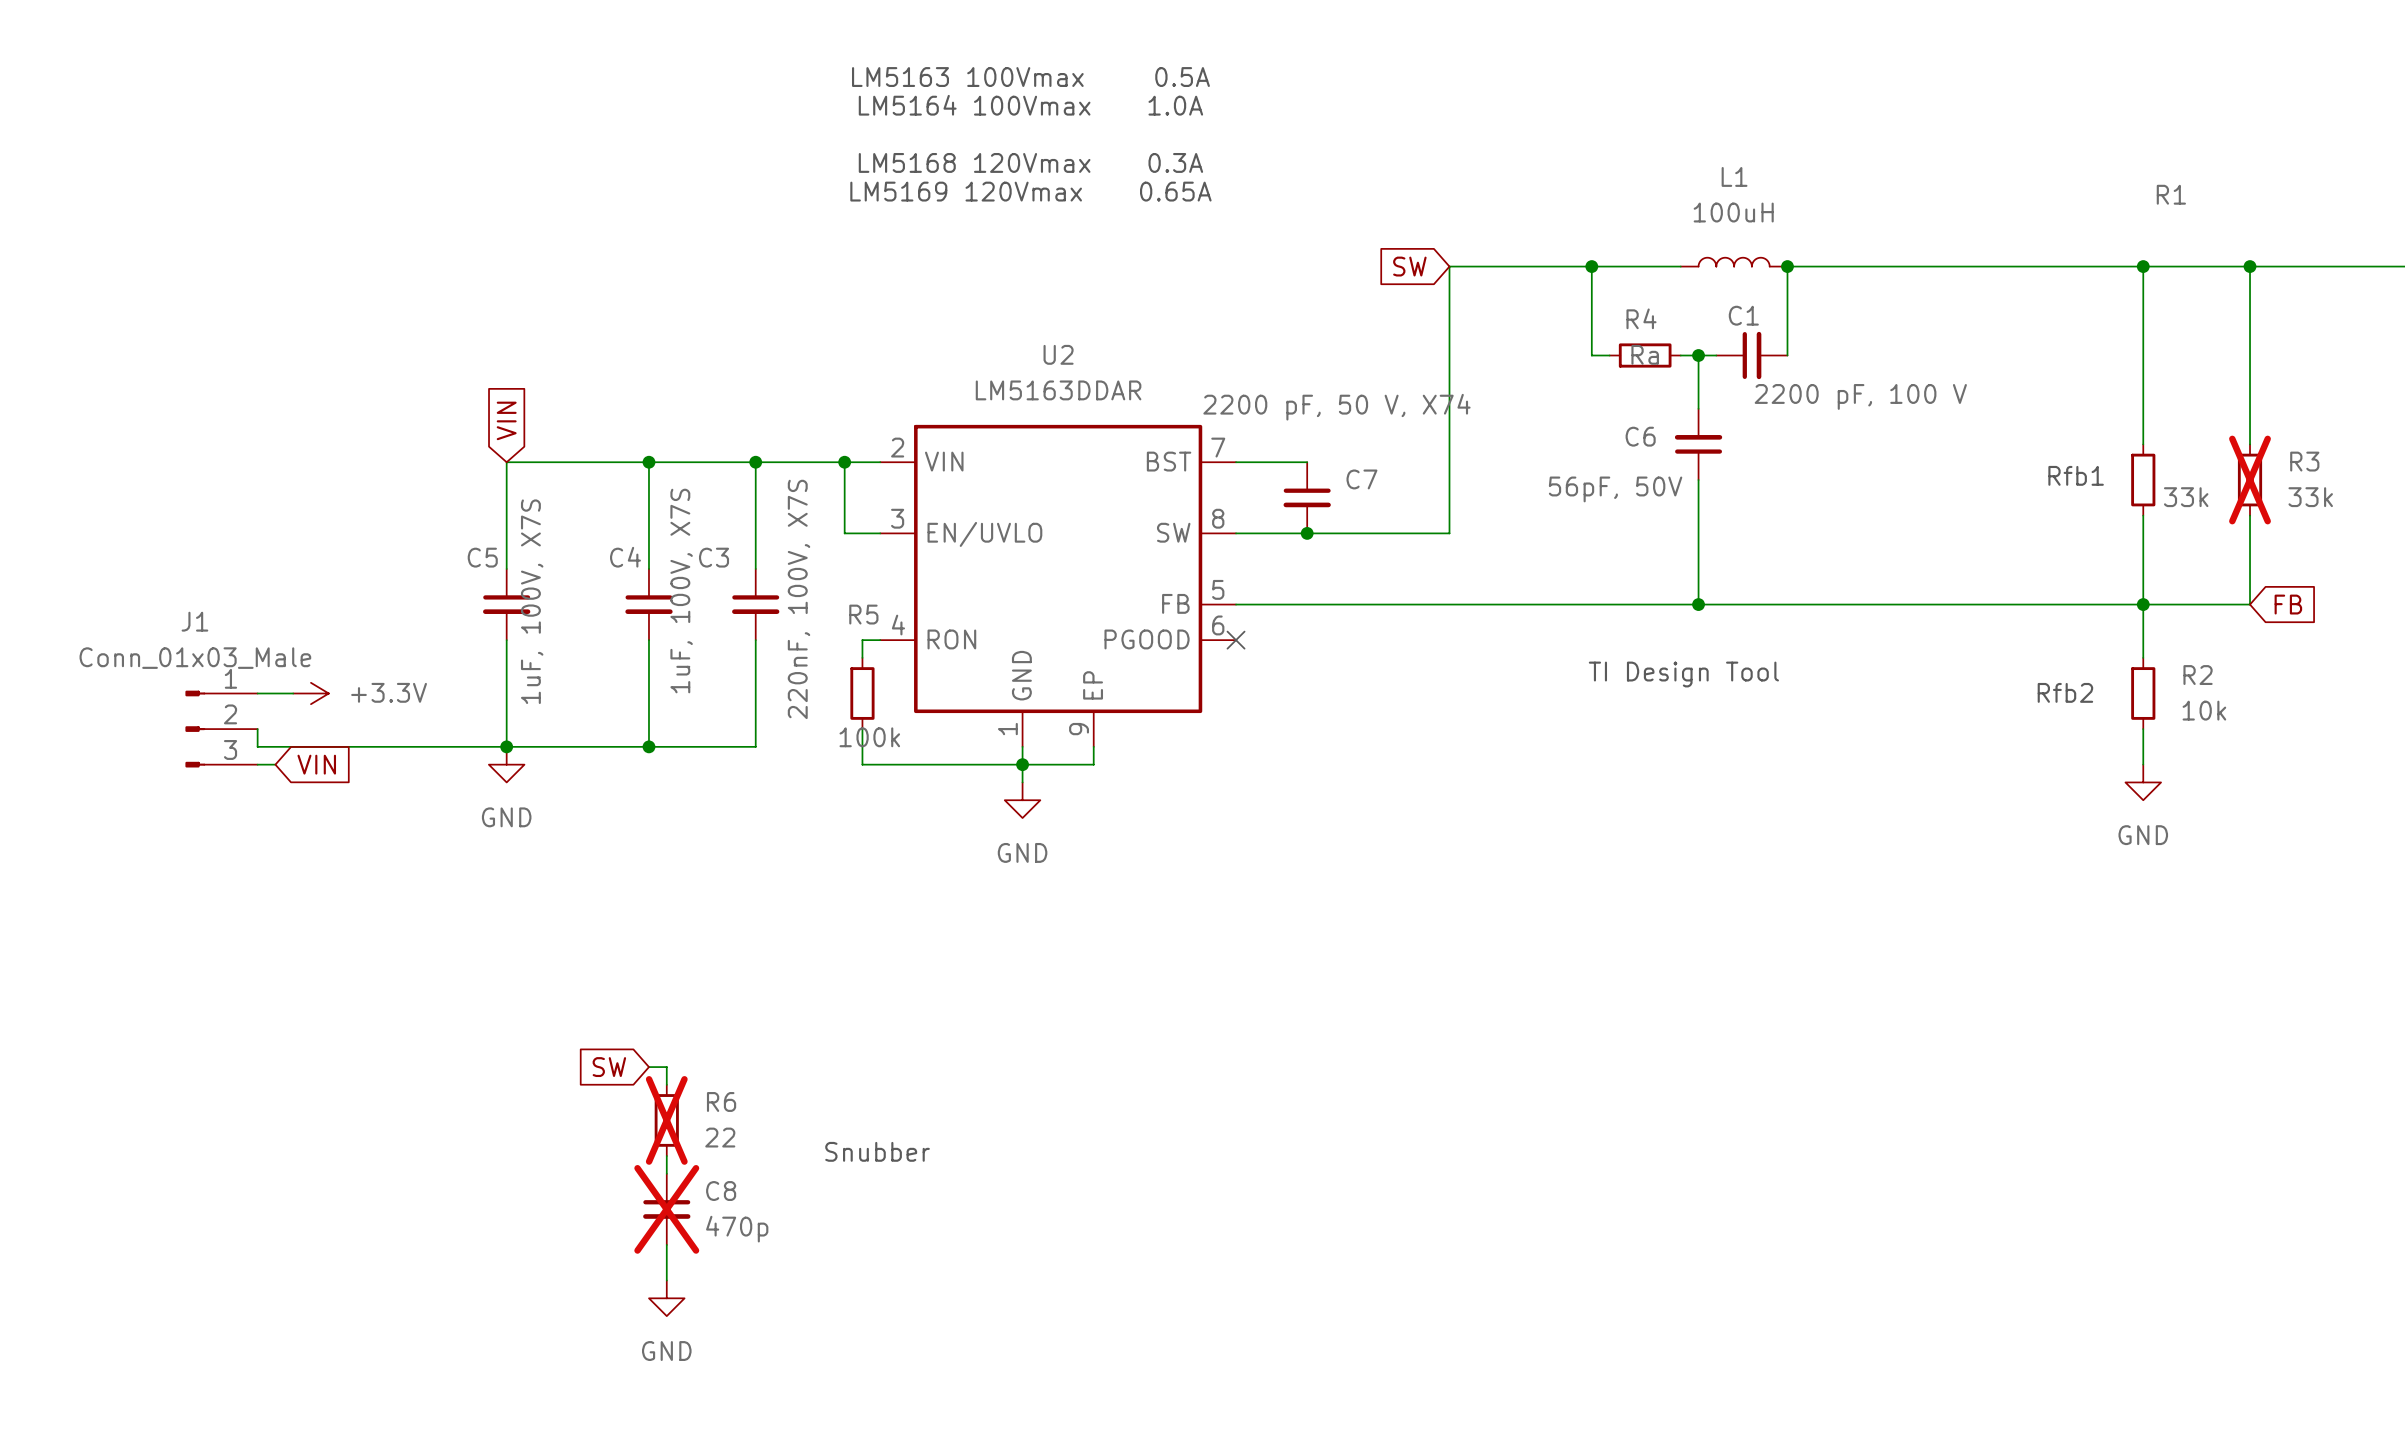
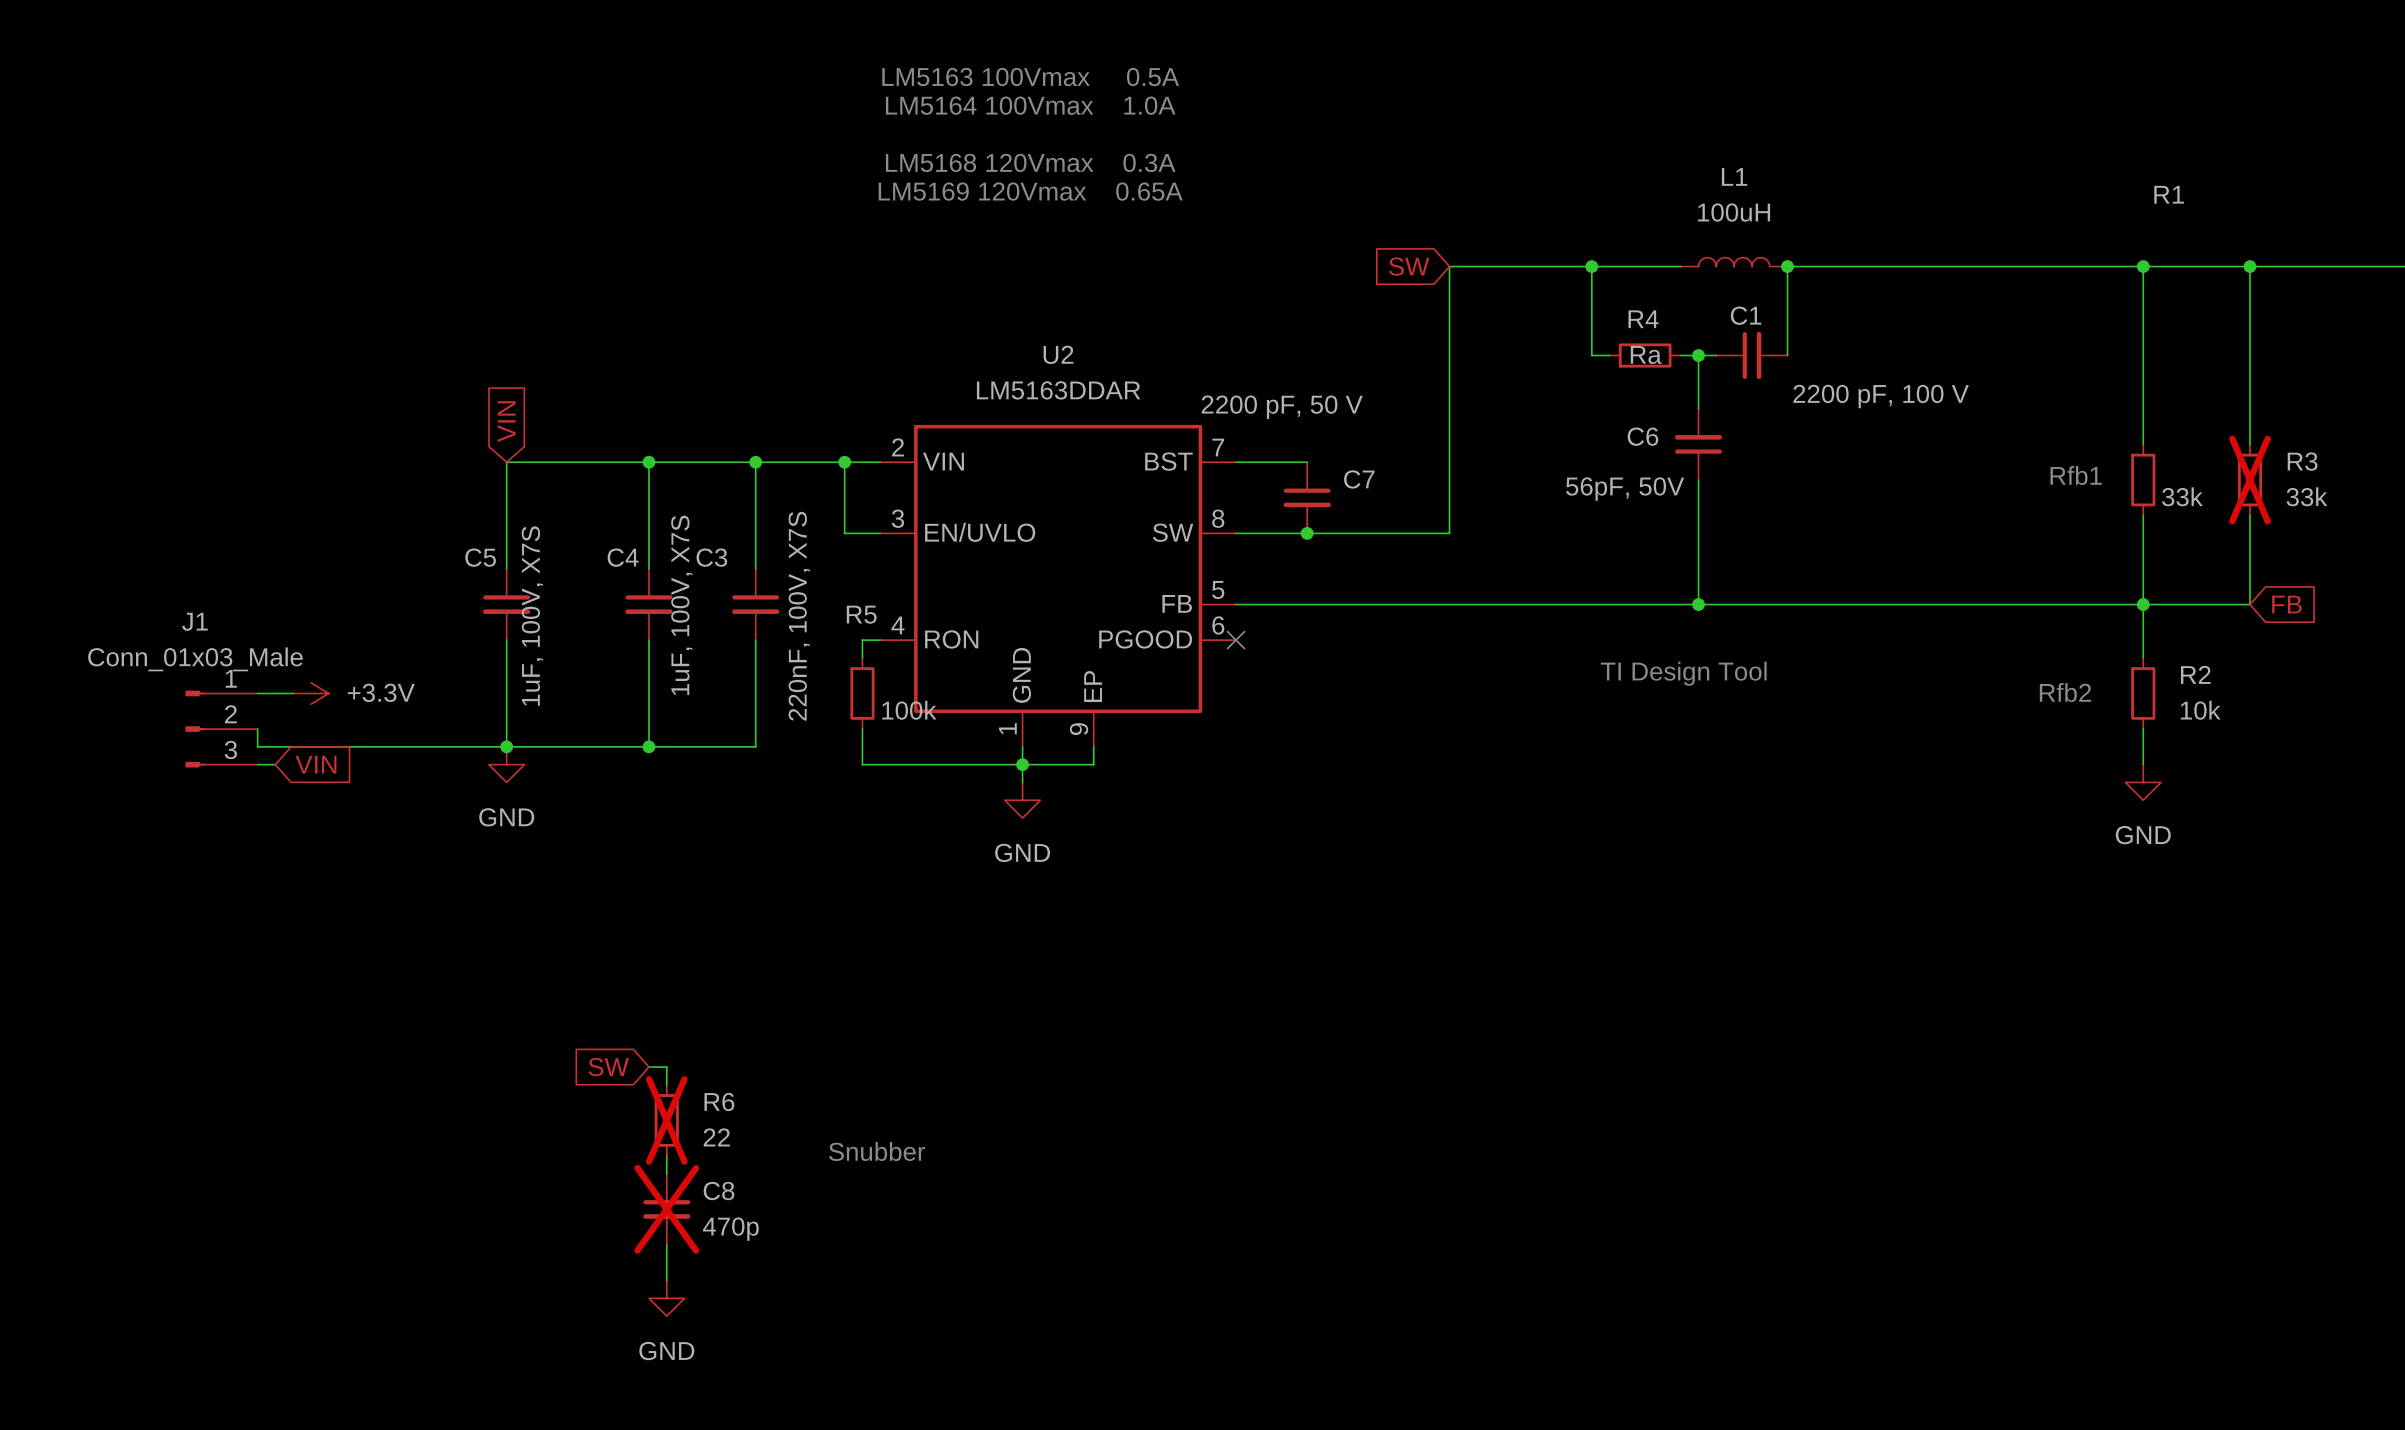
C7 value: 2200 pF, 50 V, X74 (1336, 407) -> 2200 pF, 50 V (1282, 407)
R5 value position: 100k (869, 737) -> 100k (909, 710)

